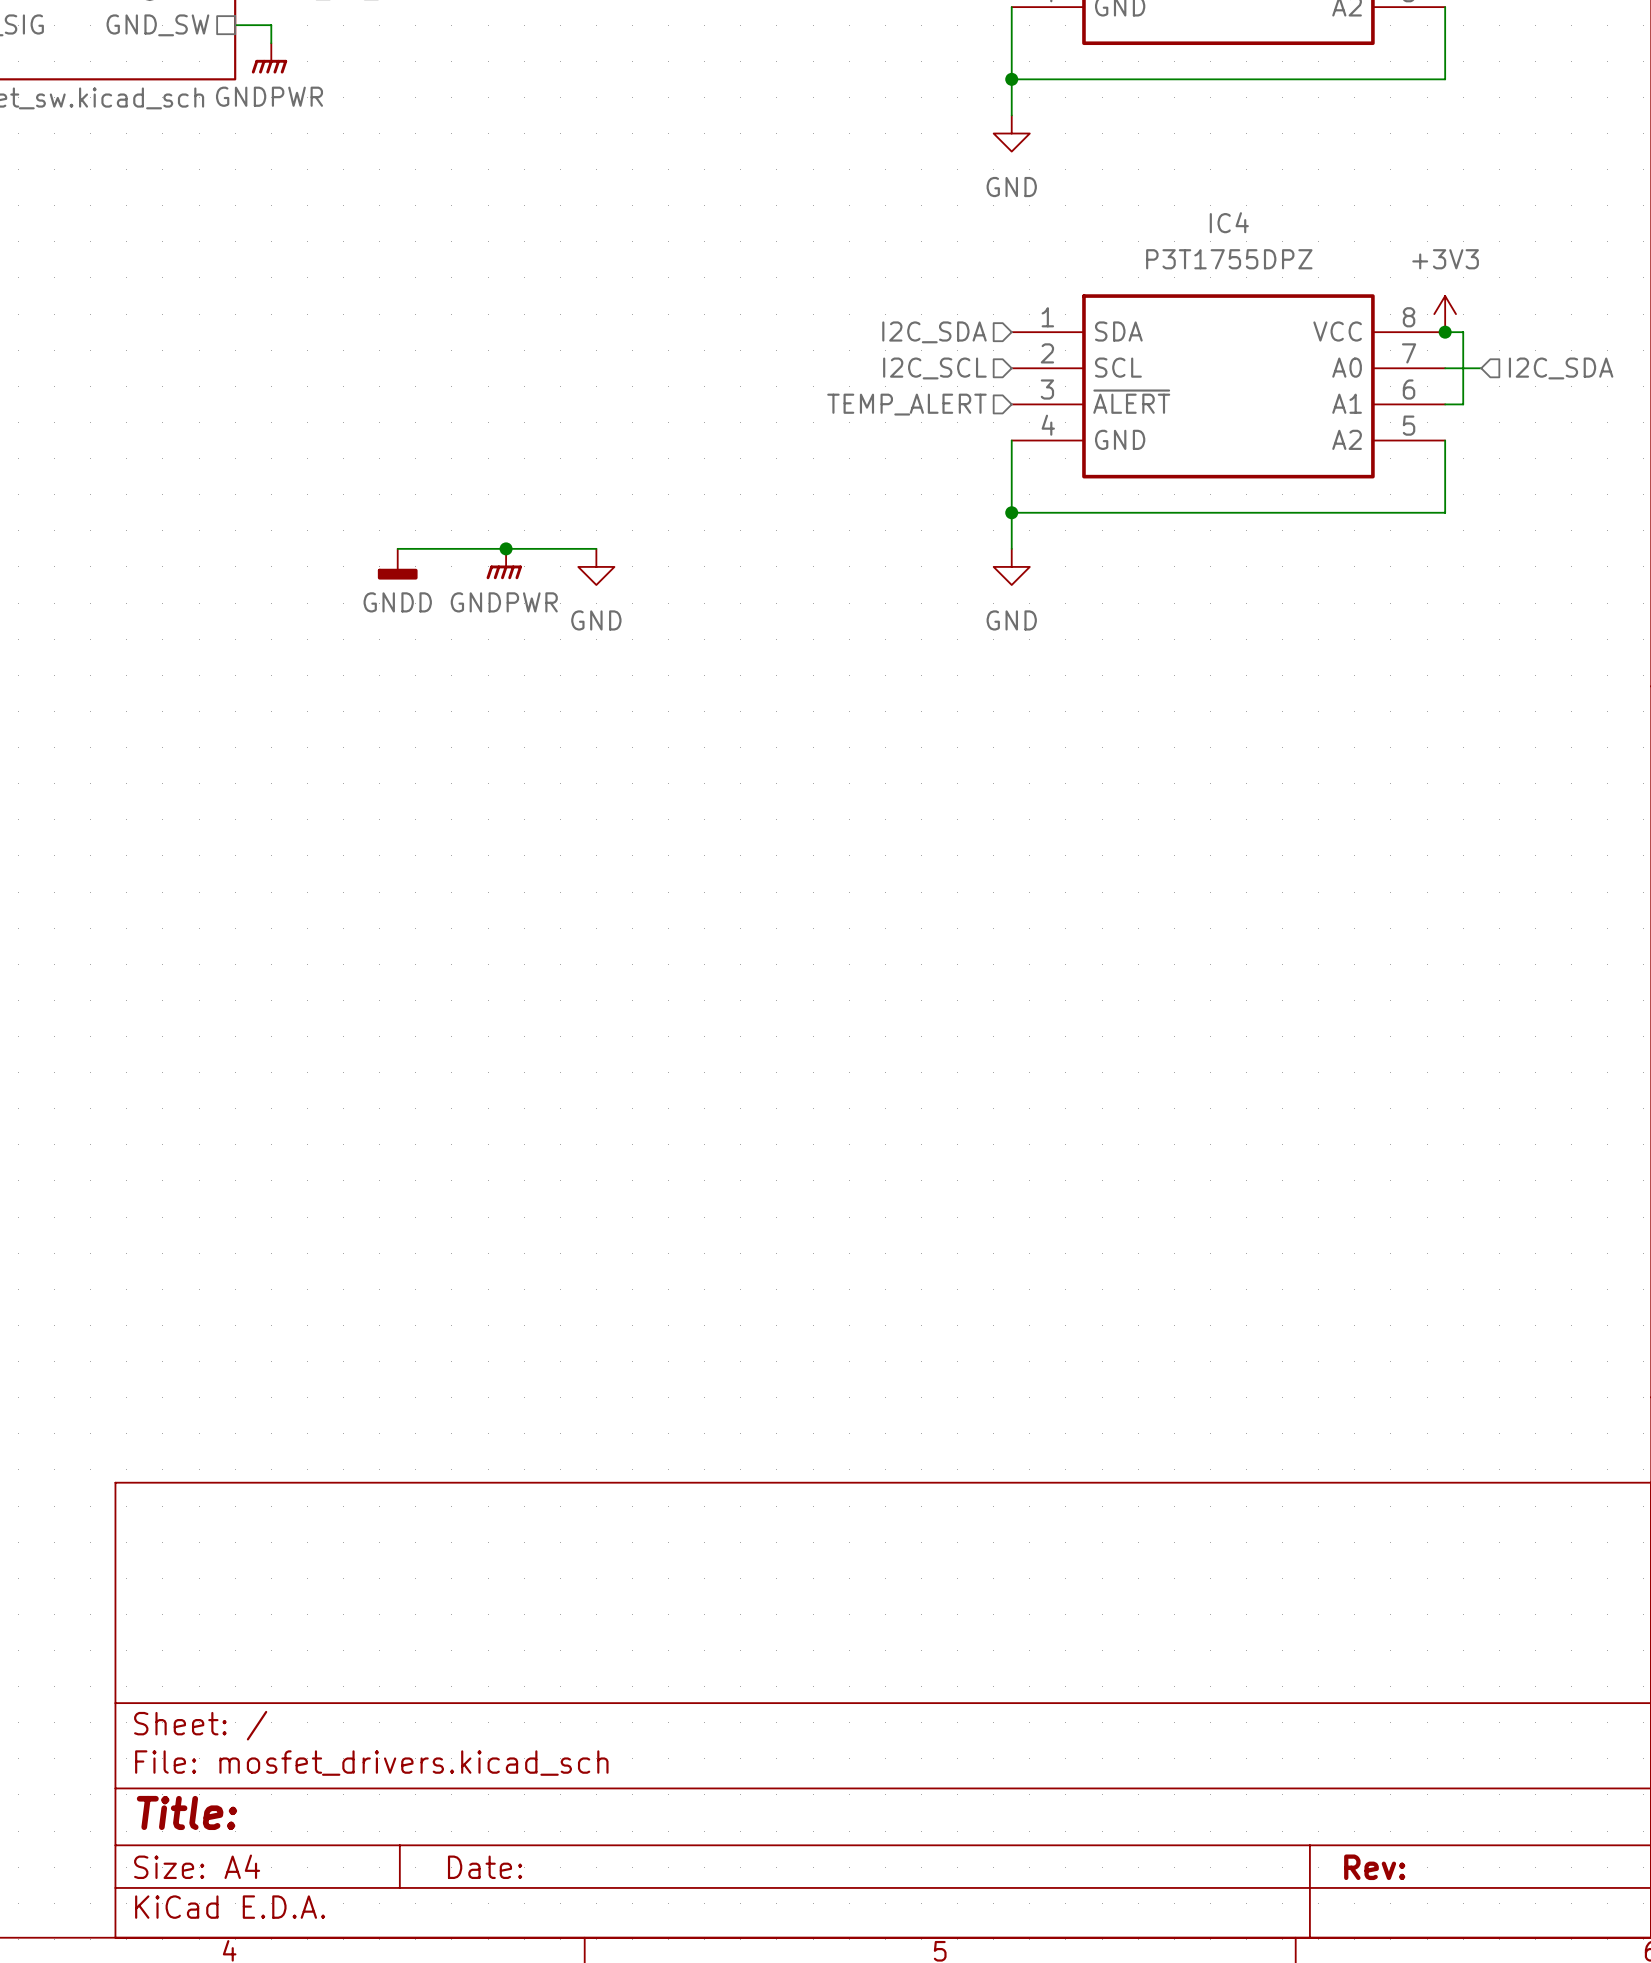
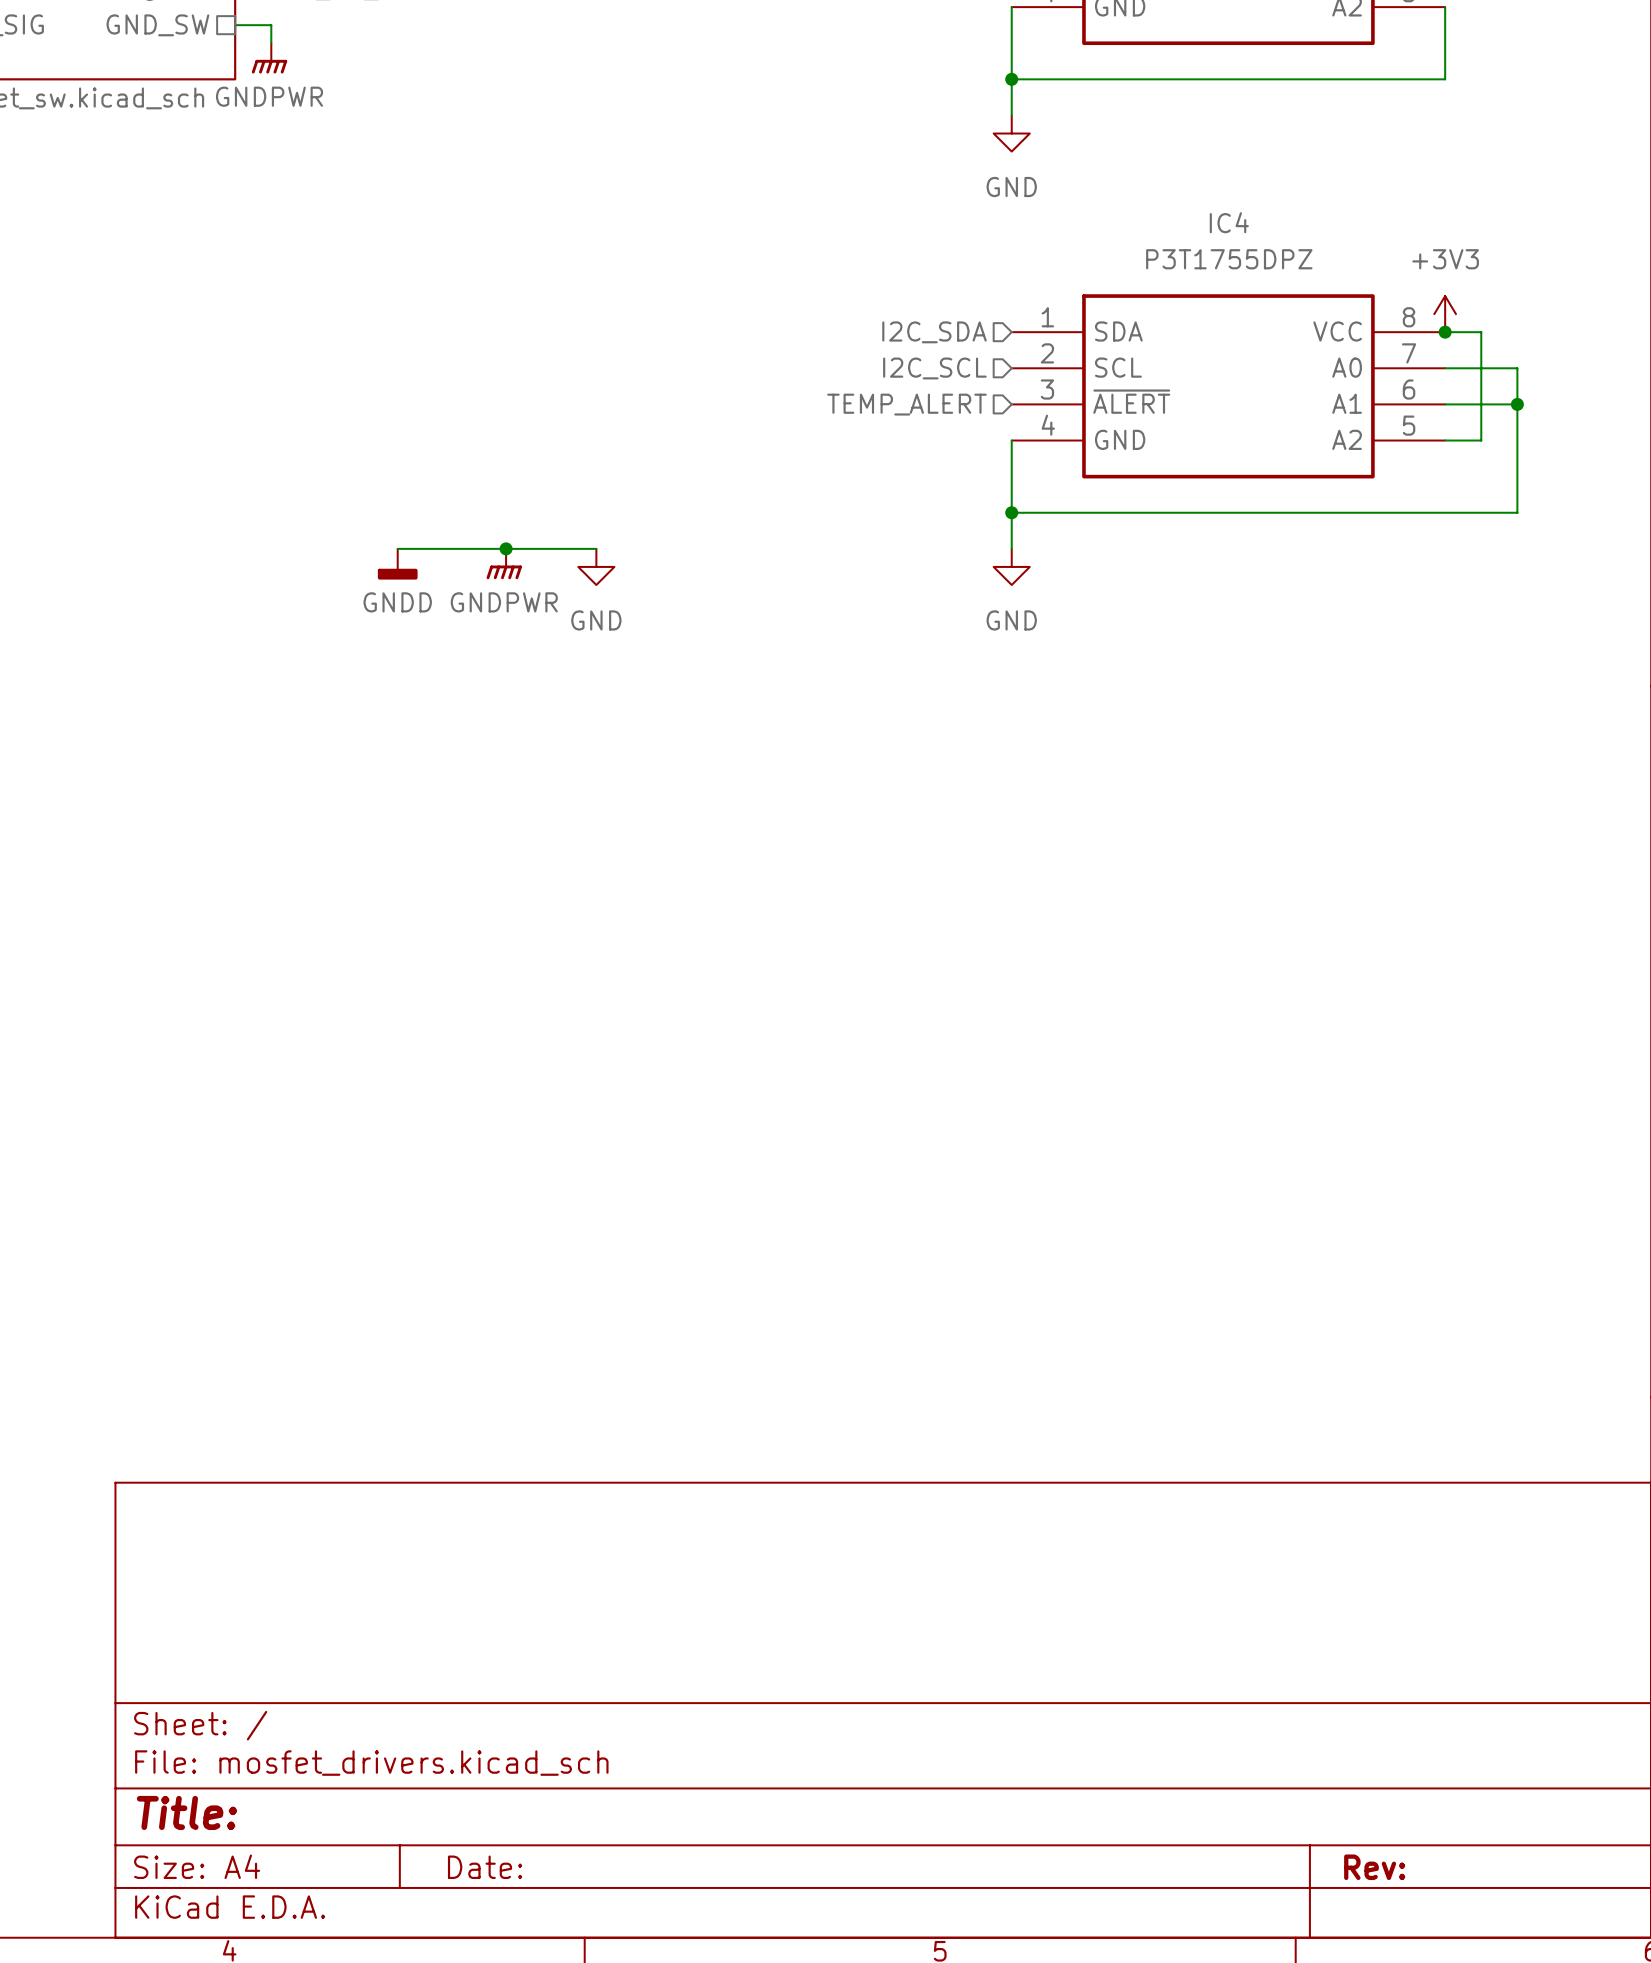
wire: (1463, 332) (1463, 404) -> (1463, 332) (1481, 332) (1481, 440) (1445, 440)
hierarchical label: I2C_SDA (1561, 368) -> none
wire: none -> (1463, 404) (1517, 404)
junction: none -> (1517, 404)
wire: (1445, 440) (1445, 512) -> (1481, 368) (1517, 368) (1517, 512) (1445, 512)

